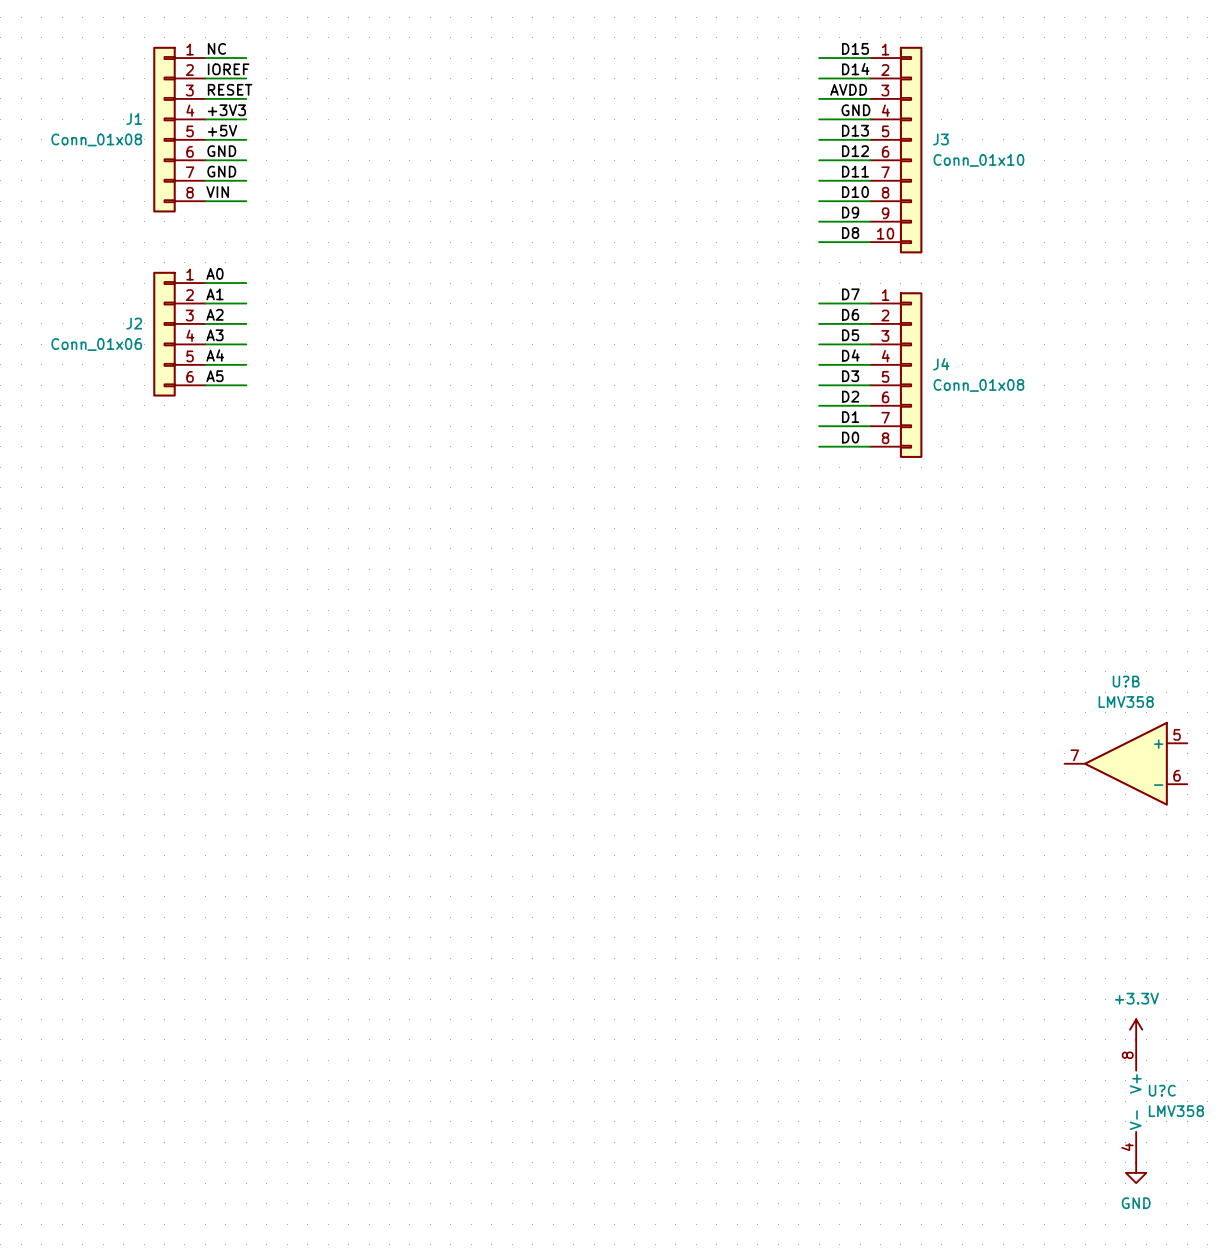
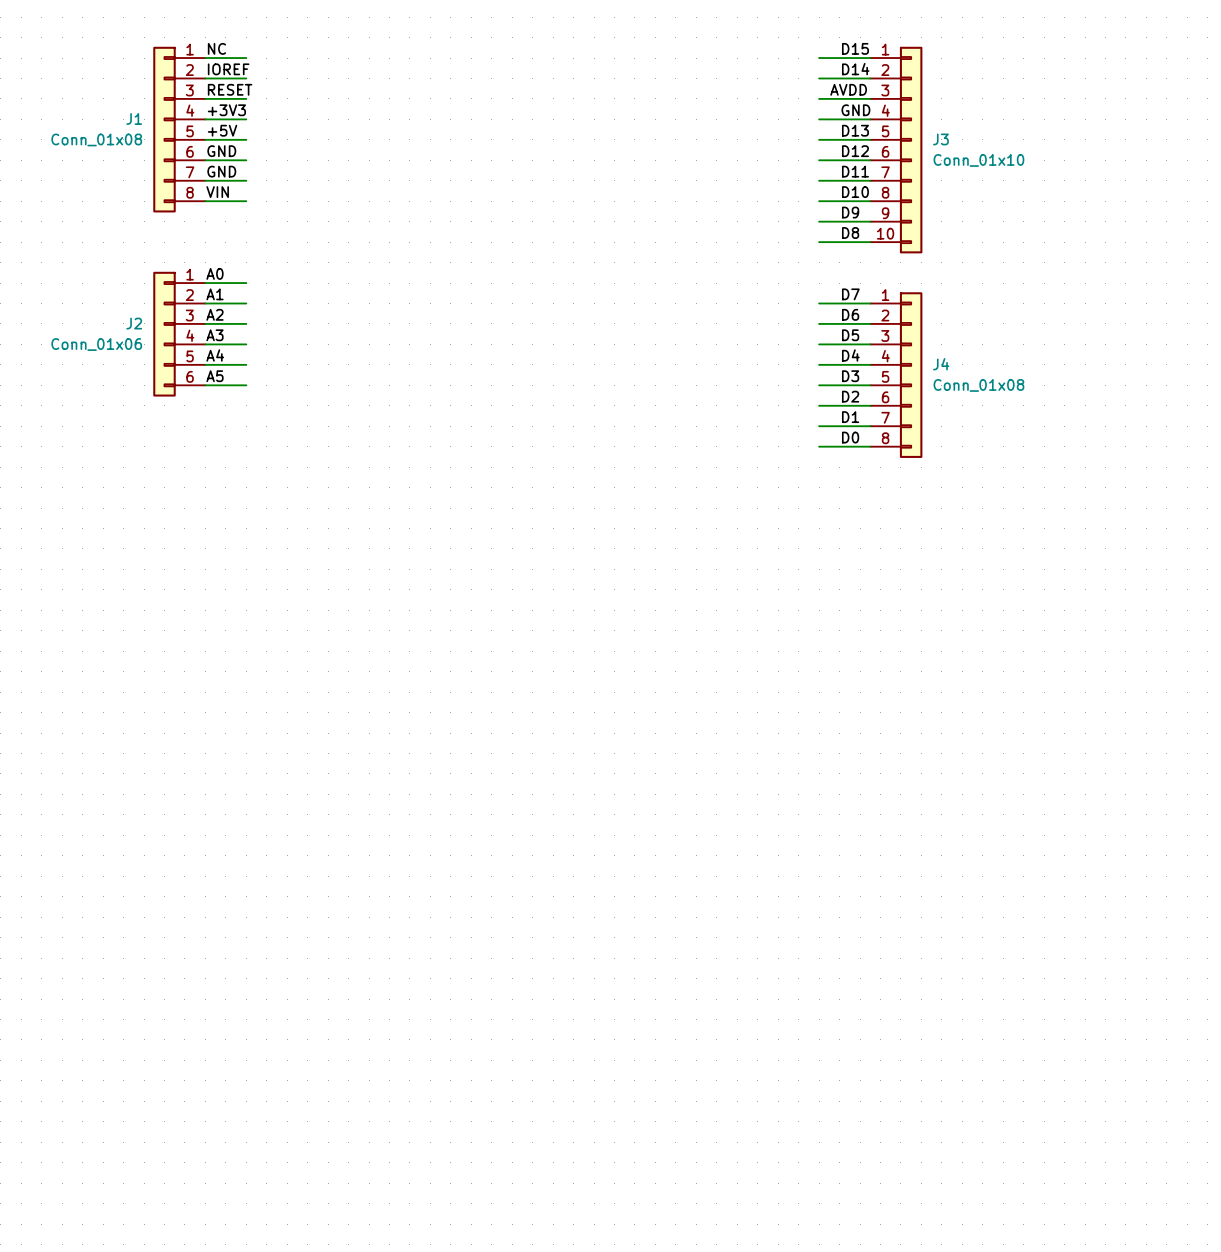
U?B: LMV358 (1125, 763) -> none
power symbol: +3.3V (1136, 1029) -> none
U?C: LMV358 (1136, 1101) -> none
power symbol: GND (1136, 1172) -> none

